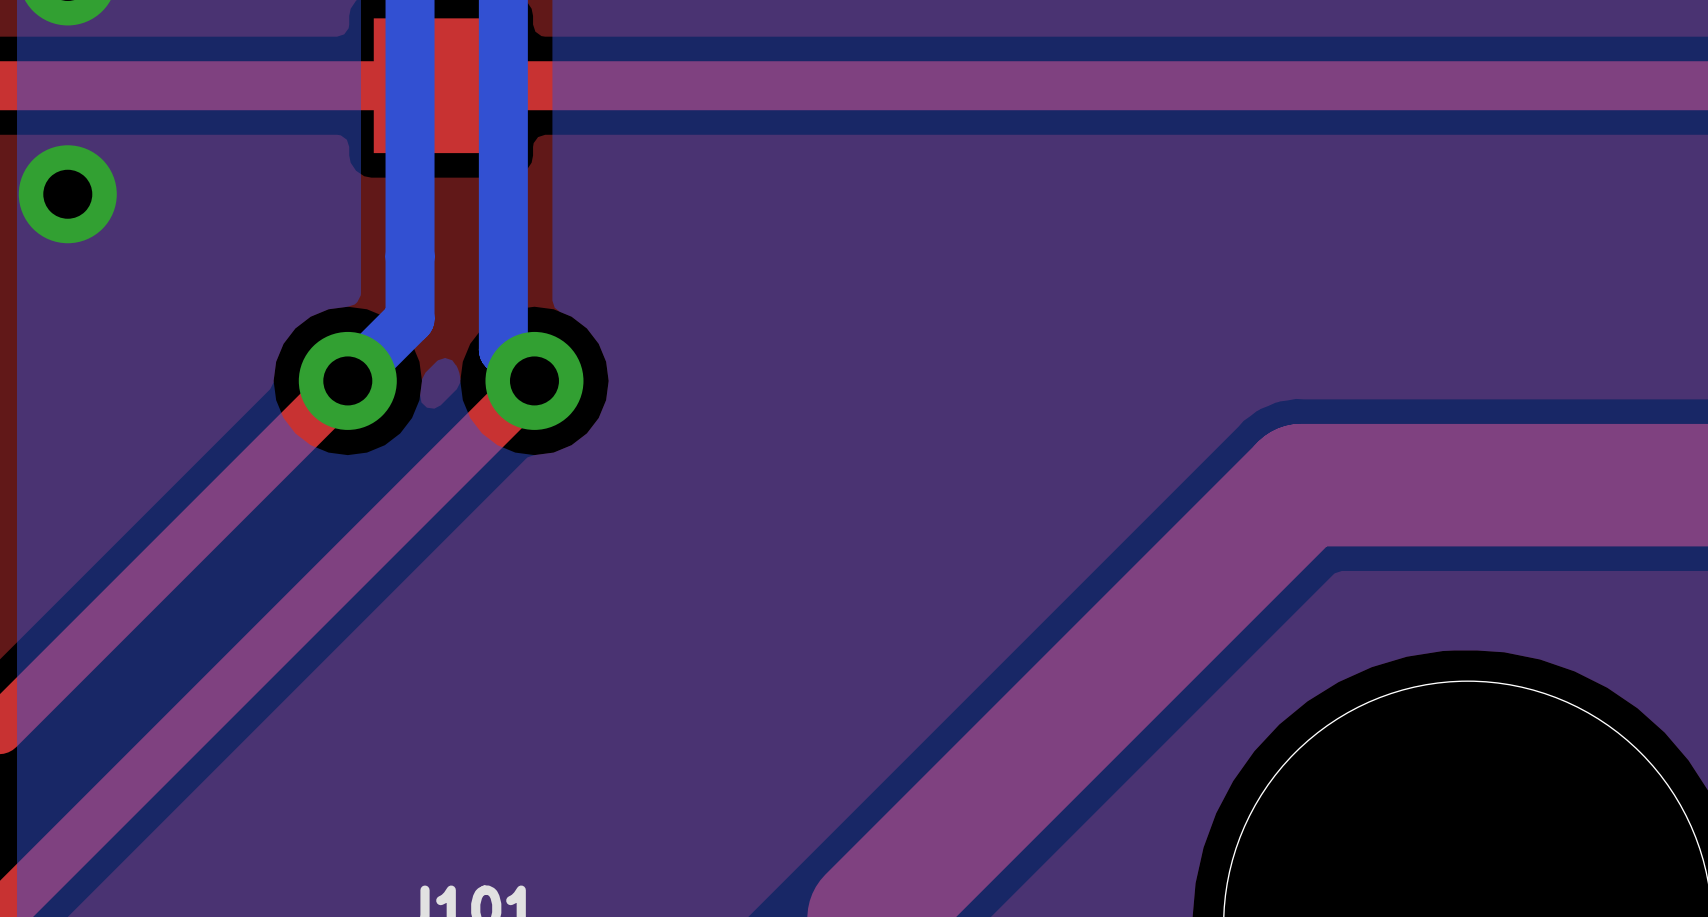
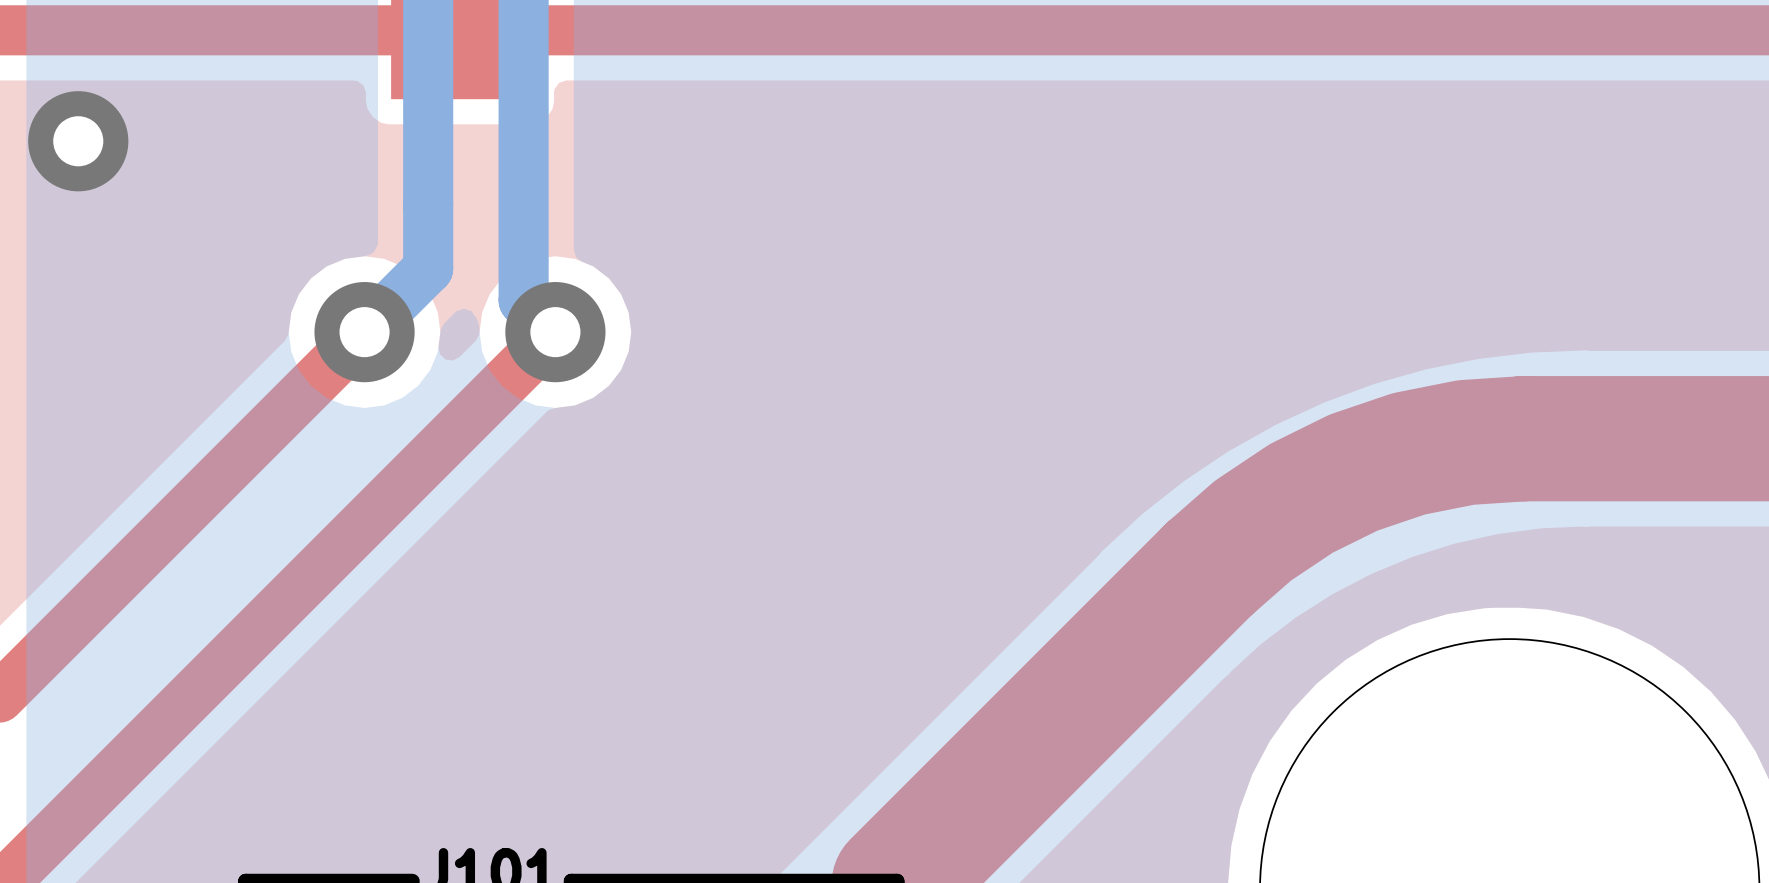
top track: (1481, 485) (1301, 485) (1173, 612) -> (1523, 438) (1465, 442) (1408, 453) (1353, 472) (1301, 498) (1252, 530) (1209, 569)

